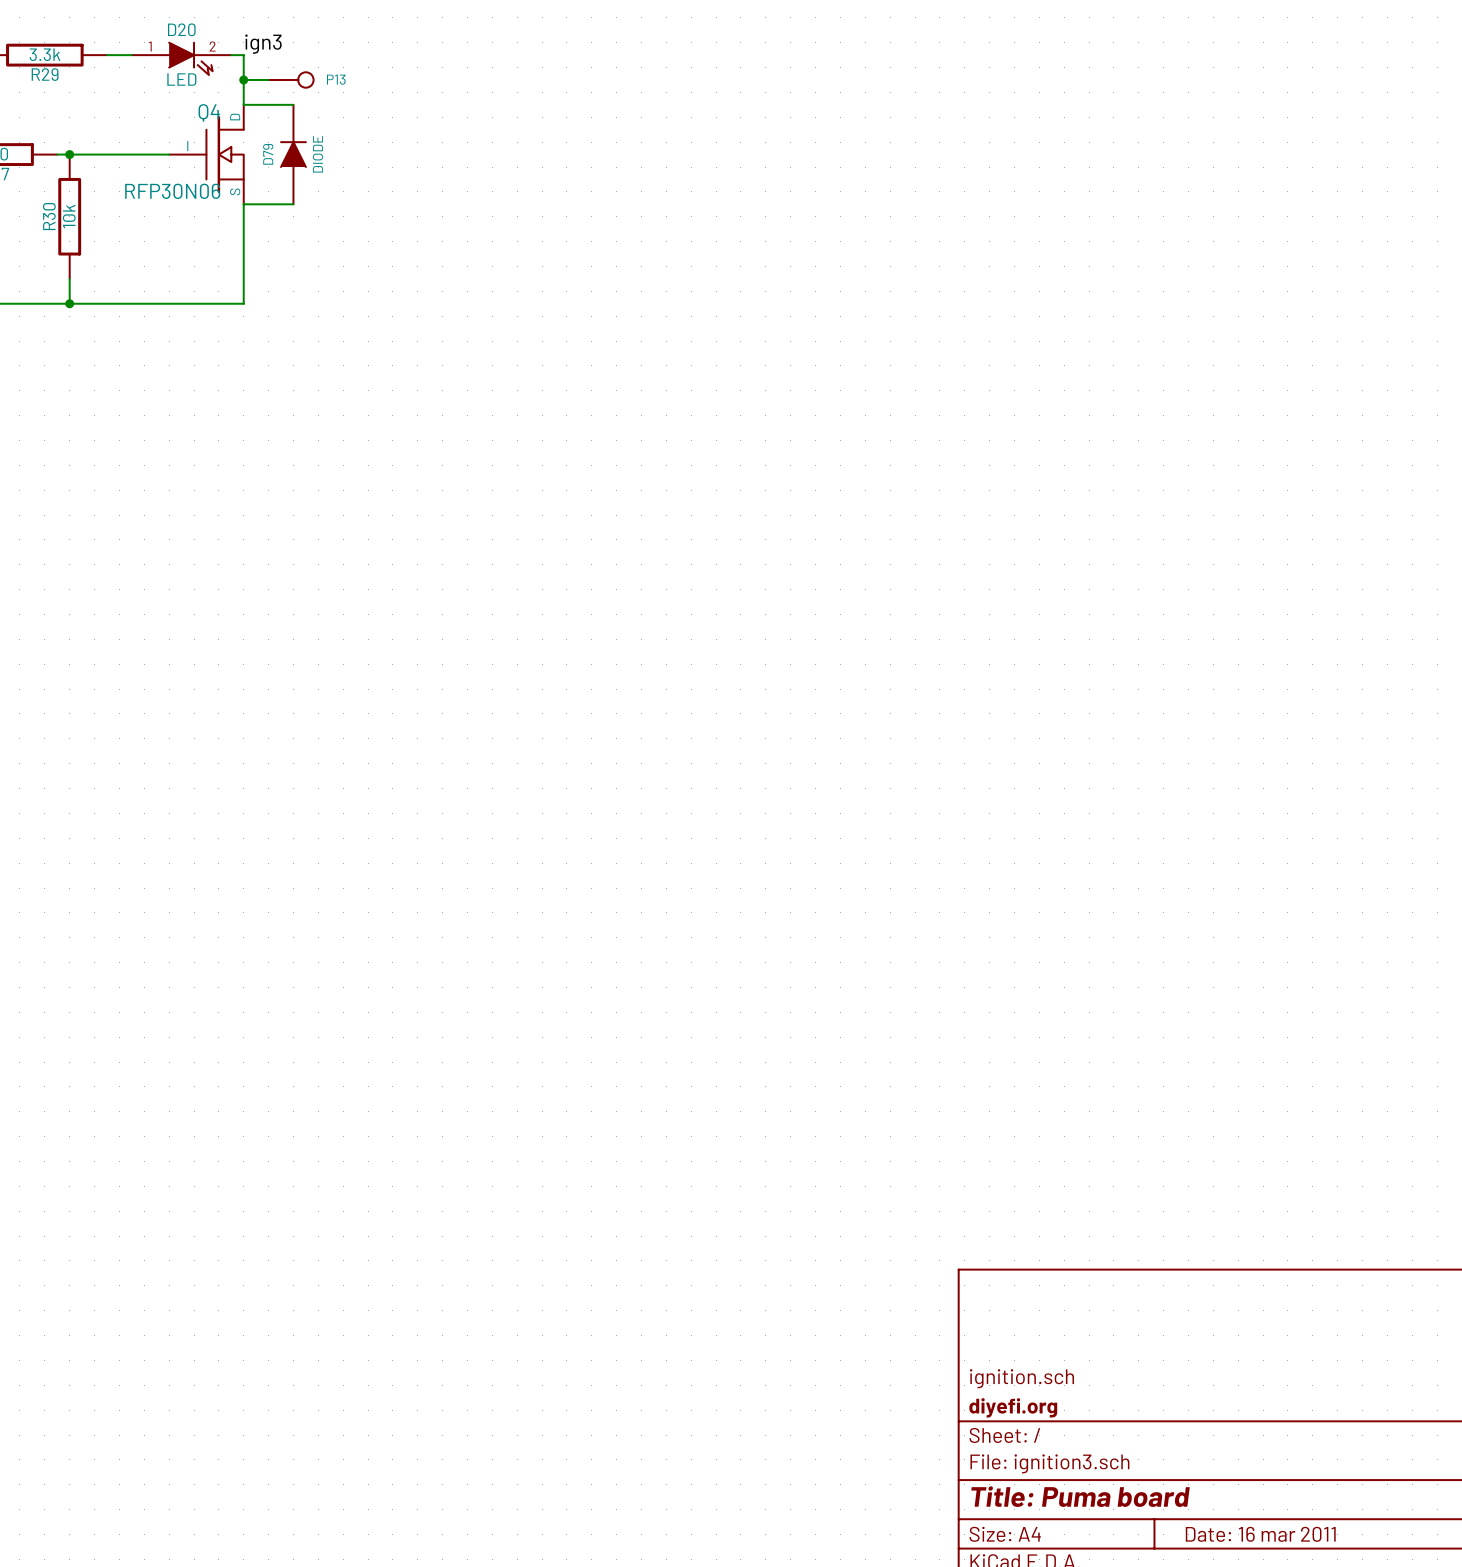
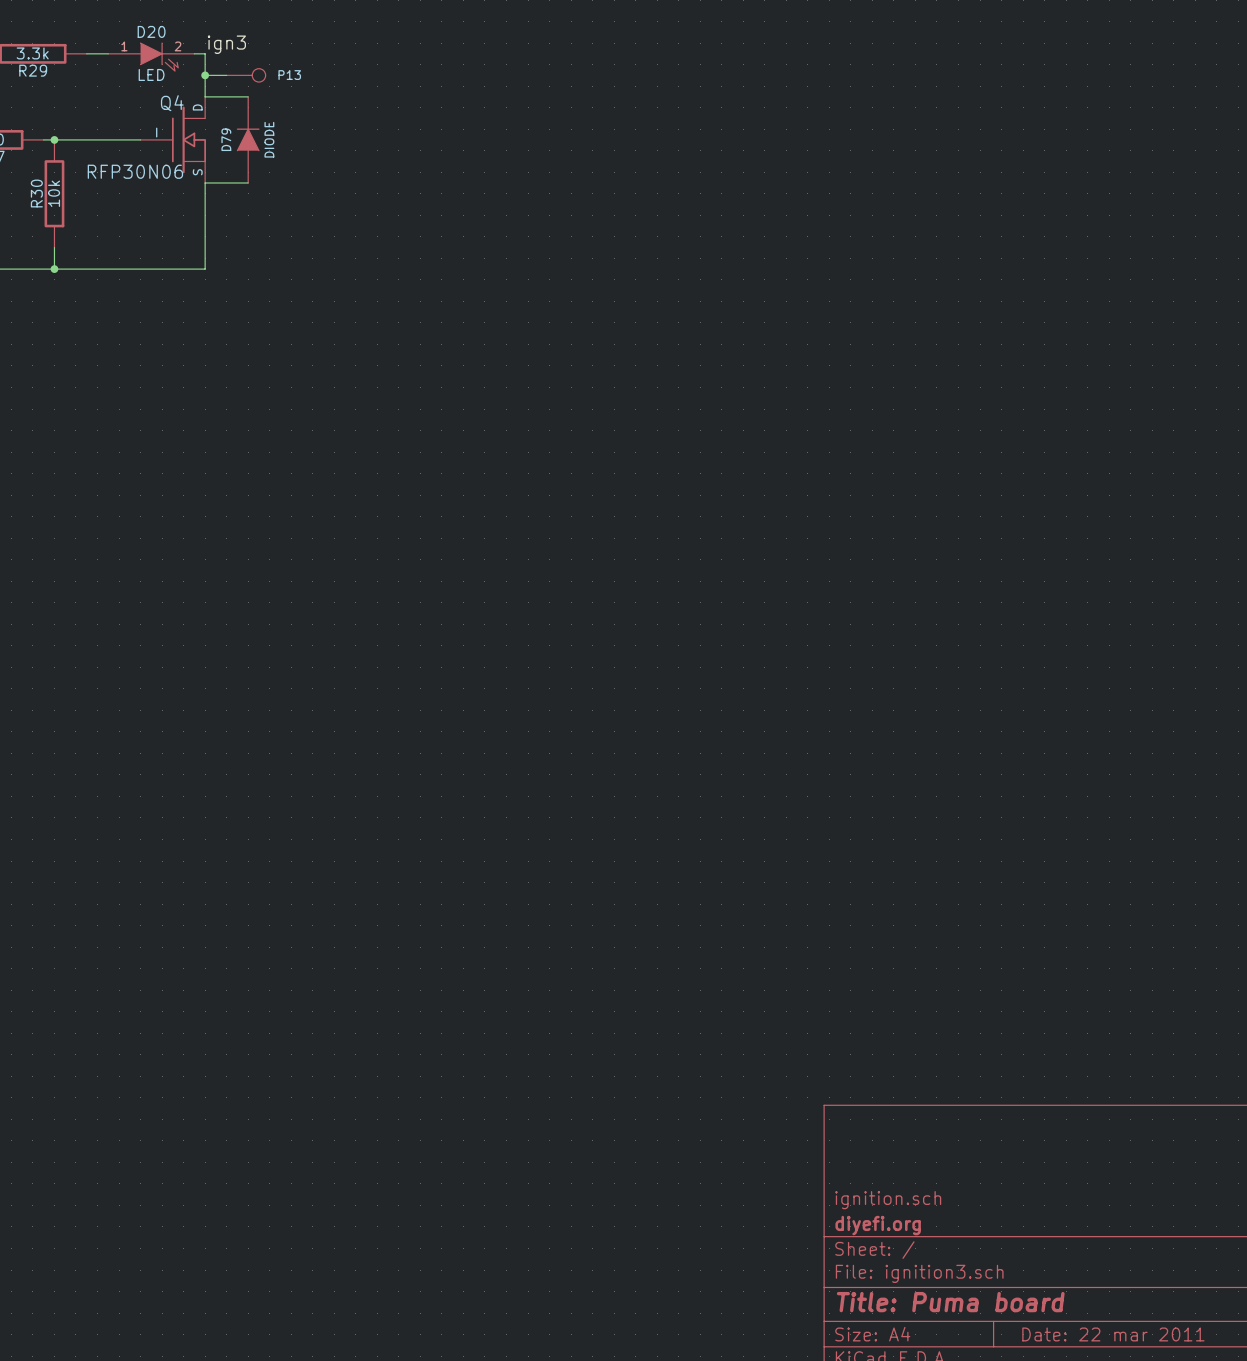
title block: Date: 16 mar 2011 (1260, 1534) -> Date: 22 mar 2011 (1113, 1334)

